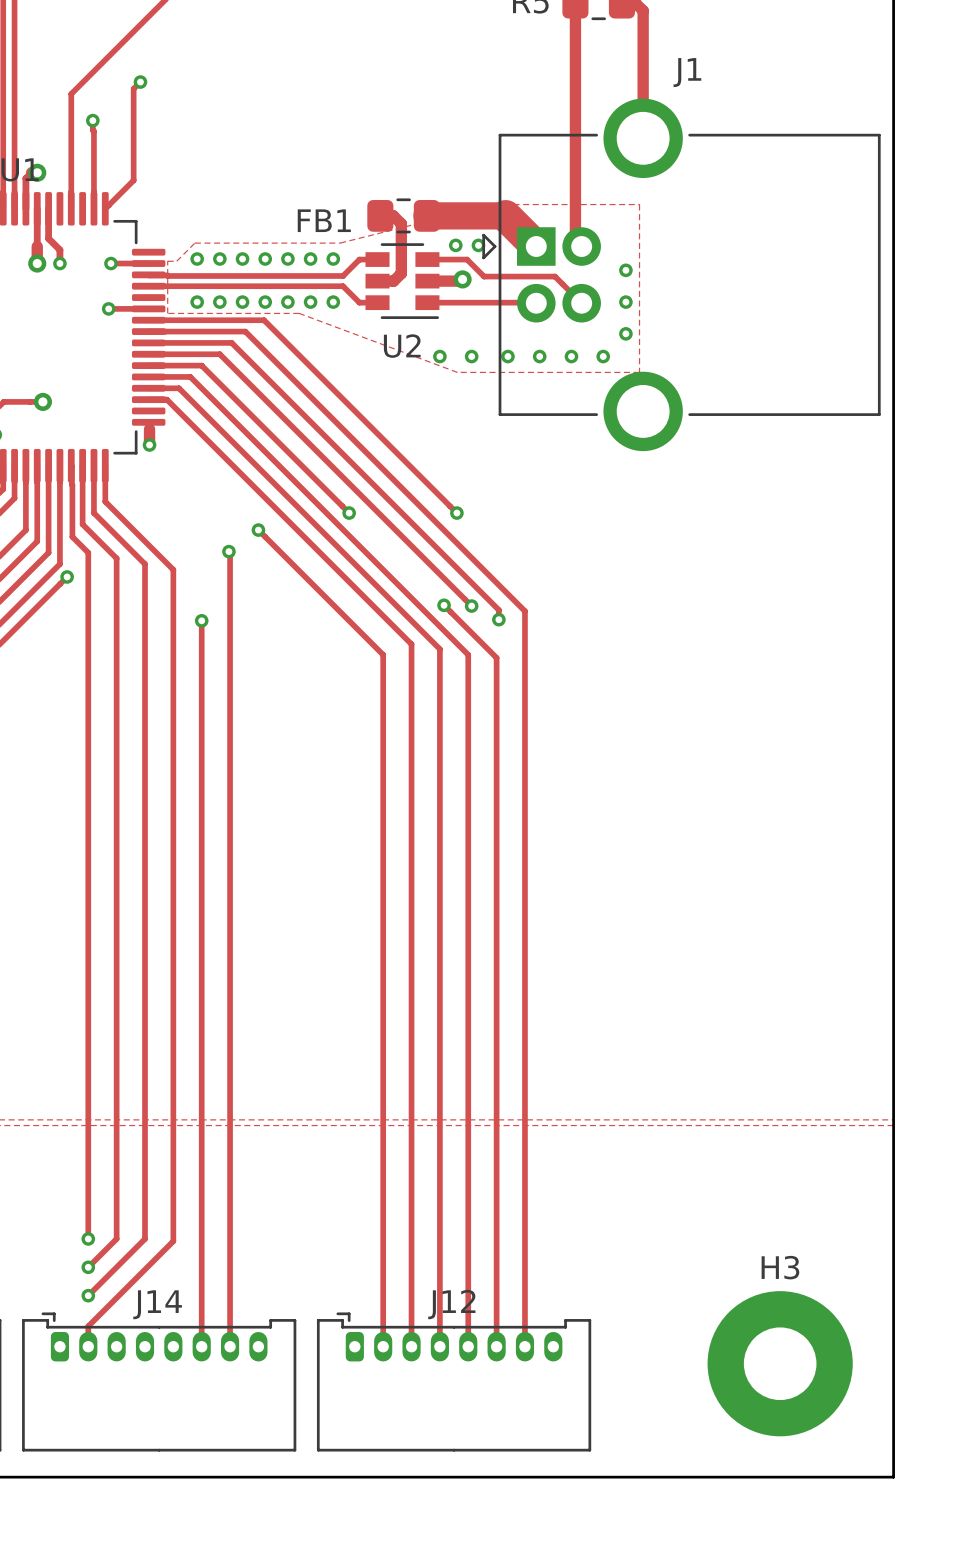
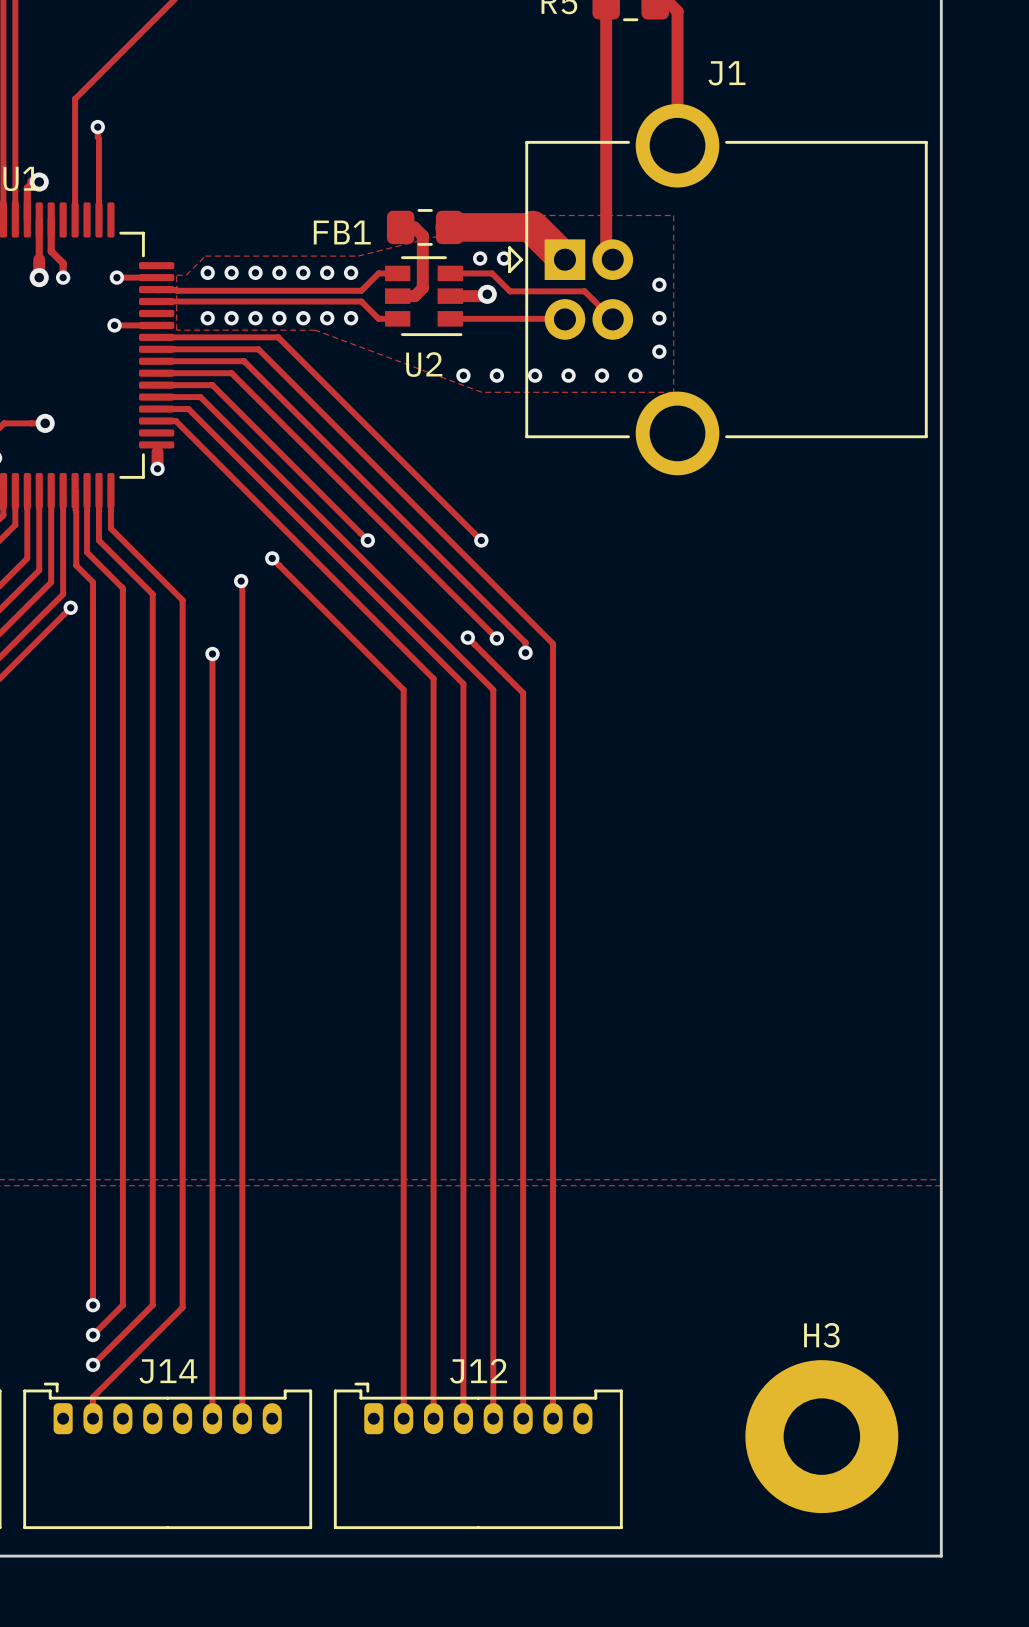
track: (140, 82) (133, 88) (133, 180) (105, 208) -> none
via: (140, 82) -> none

